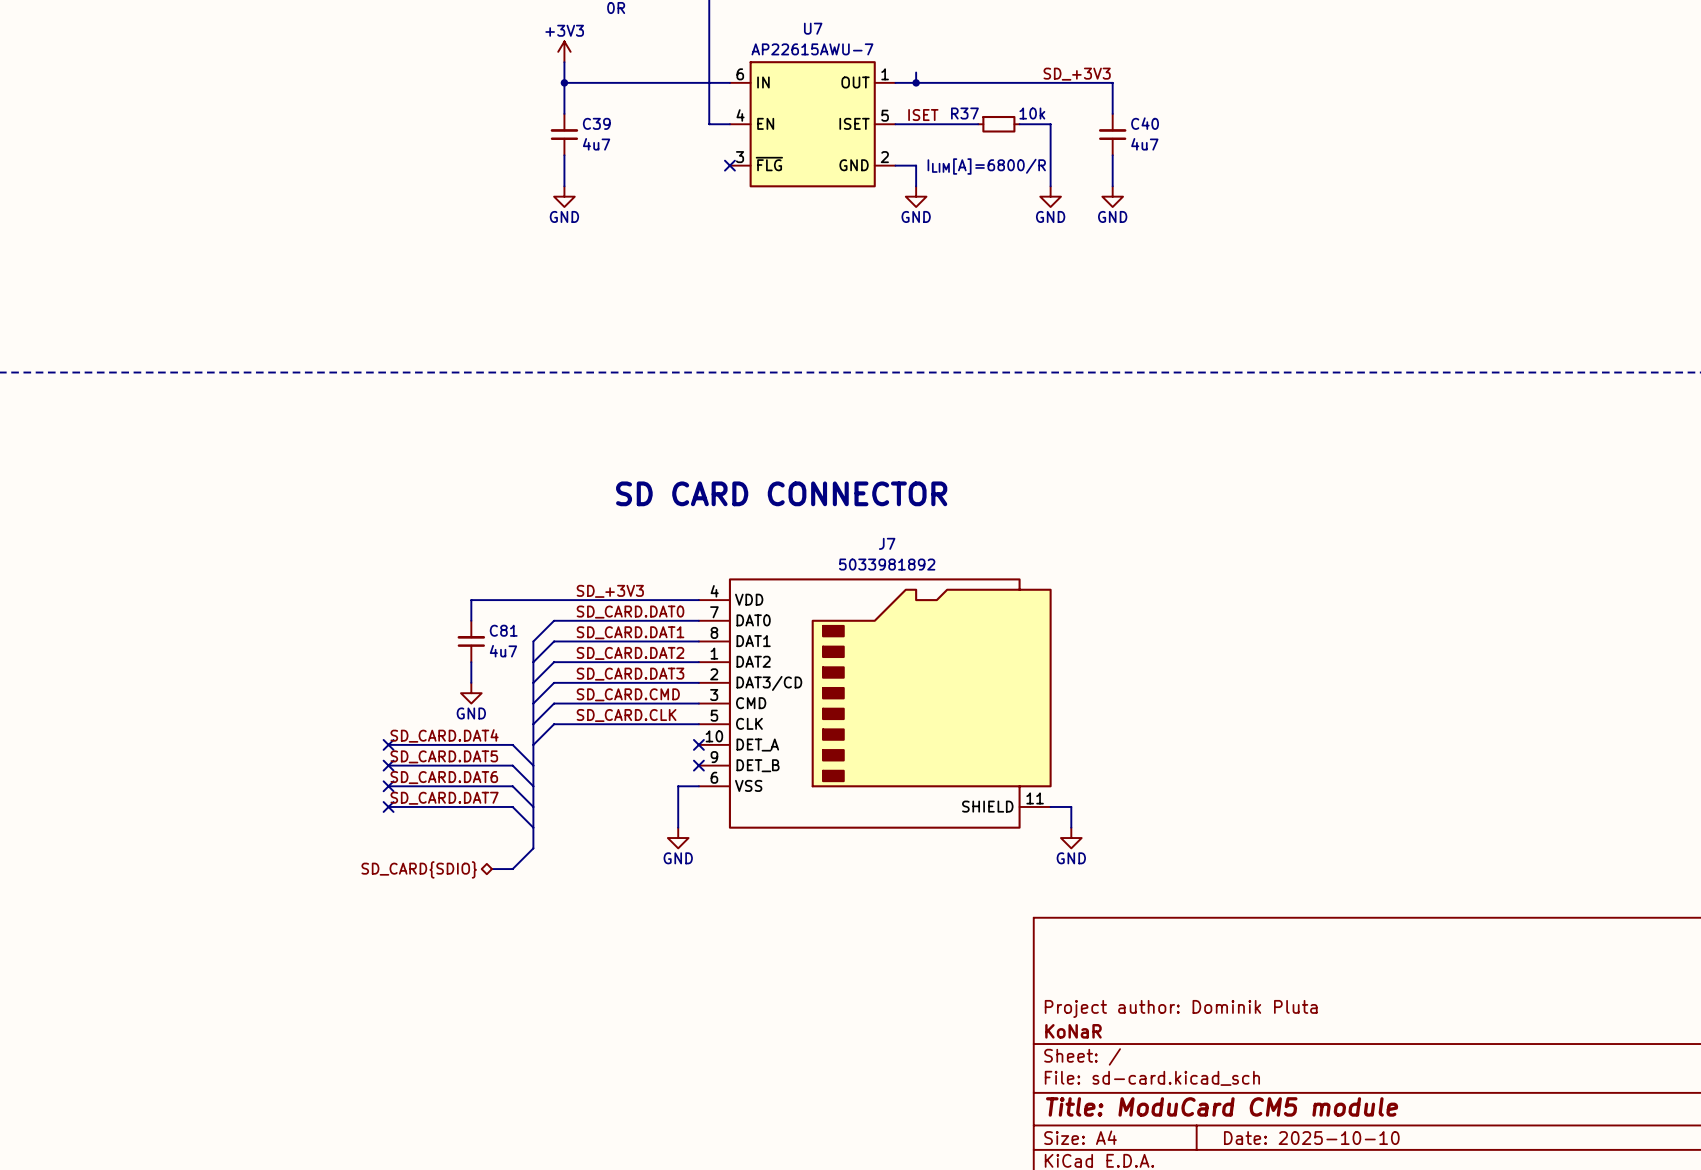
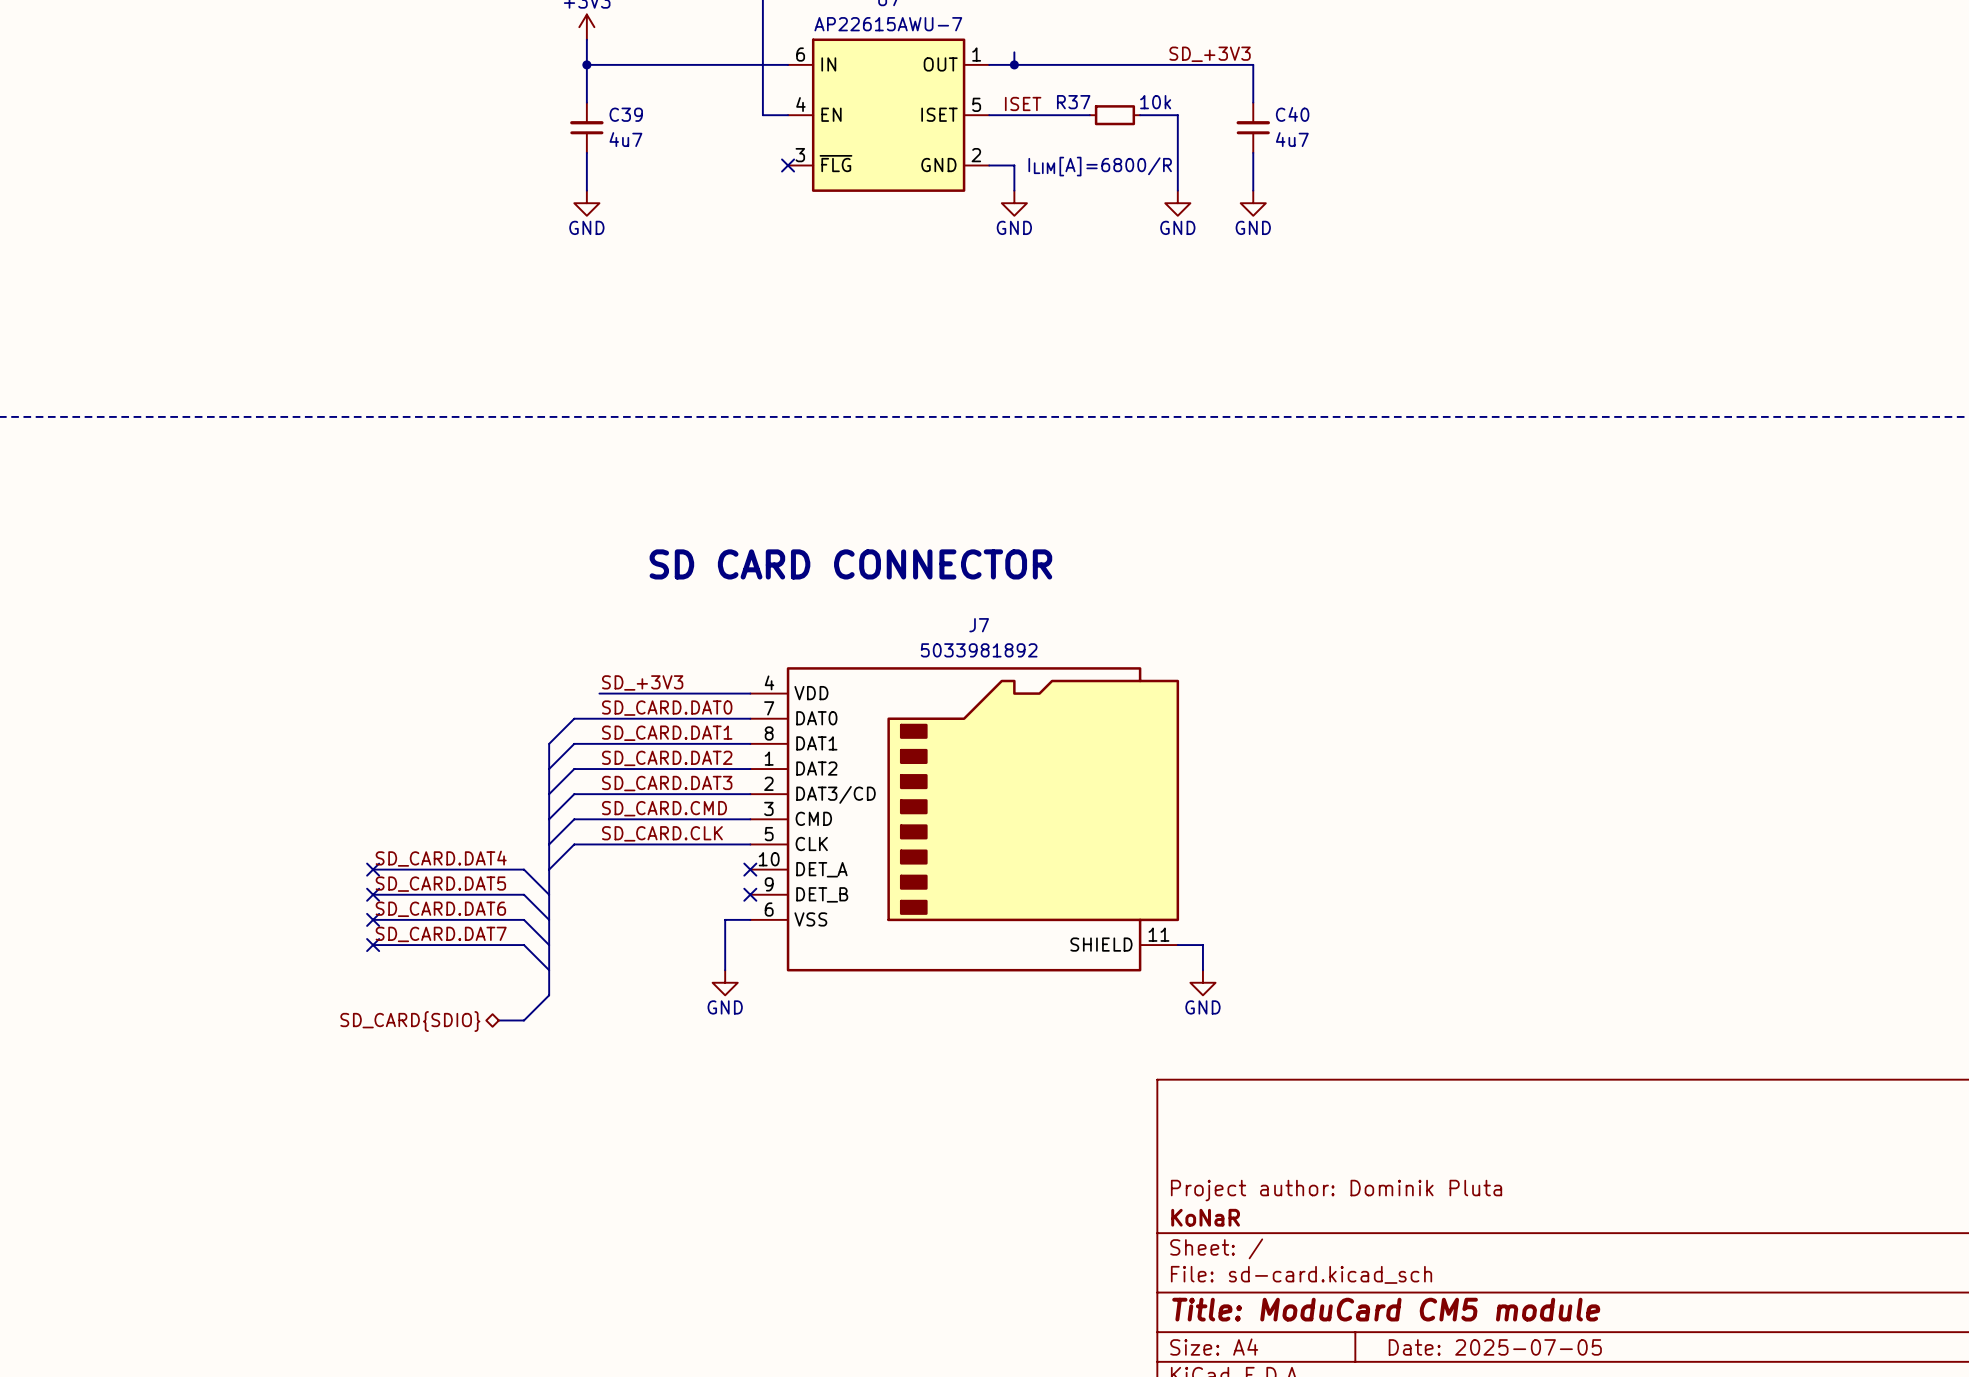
wire: (574, 600) (471, 600) (471, 620) -> none
C81: (471, 641) -> none
wire: (471, 662) (471, 682) -> none
power symbol: GND (471, 693) -> none
title block: Date: 2025-10-10 (1311, 1138) -> Date: 2025-07-05 (1495, 1347)

